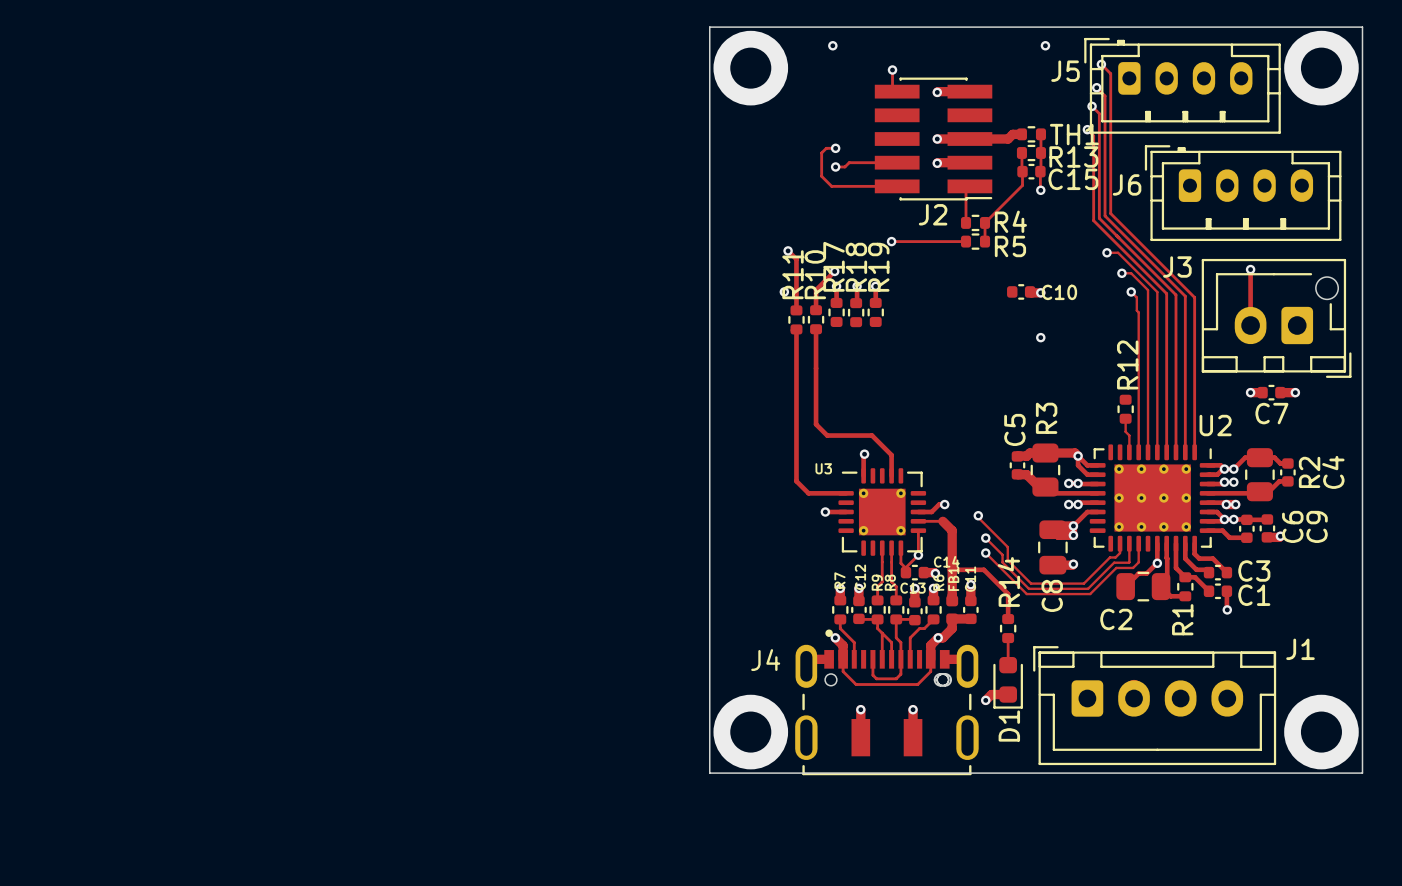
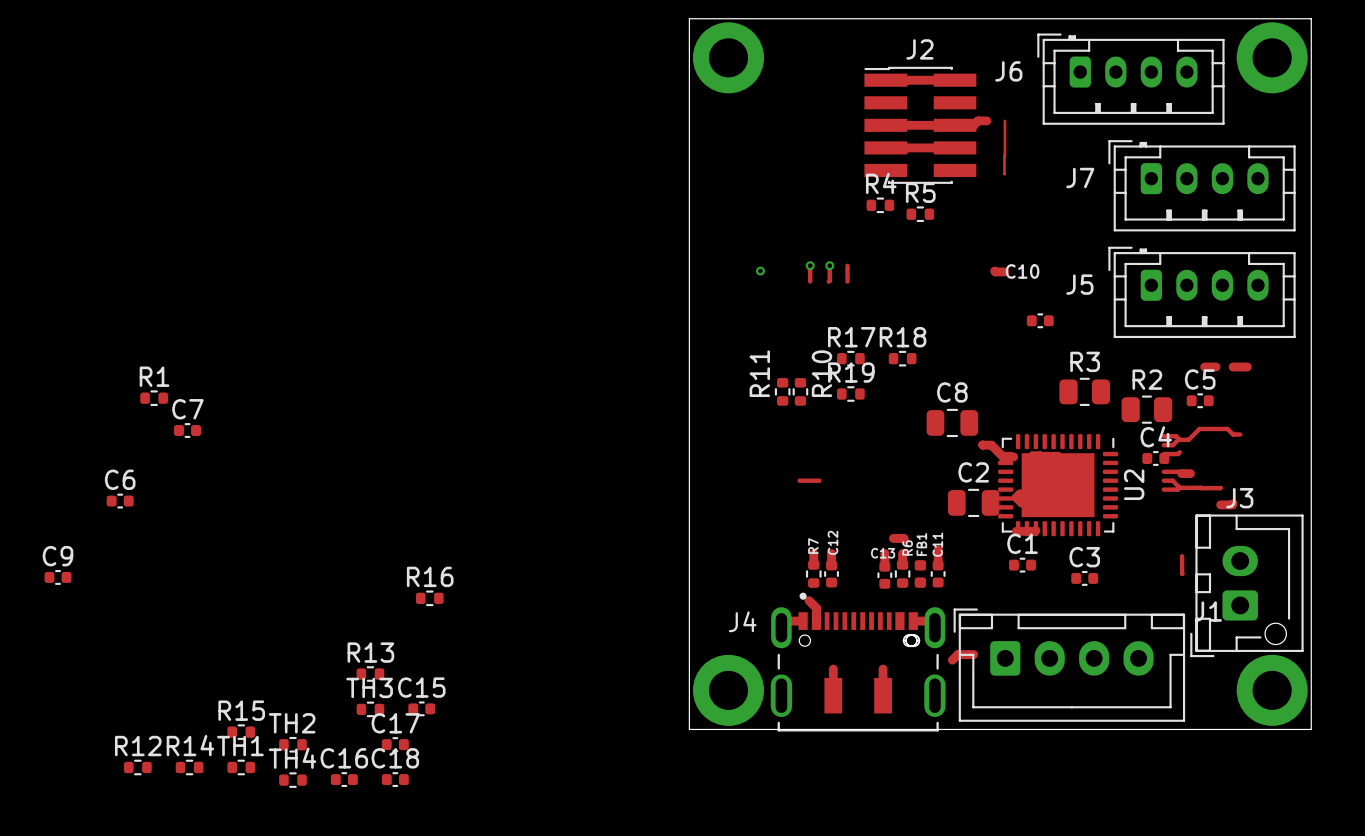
via: (832, 45) -> none
via: (1045, 45) -> none
track: (1101, 64) (1110, 73) (1110, 213) (1194, 297) (1194, 452) -> none
via: (1101, 64) -> none
track: (892, 70) (892, 91) -> none
via: (892, 70) -> none
J5 name position: J5 (1065, 71) -> J5 (1079, 284)
J5 position: (1182, 85) -> (1201, 292)
track: (1096, 87) (1105, 96) (1105, 215) (1185, 296) (1185, 452) -> none
via: (1096, 87) -> none
via: (937, 92) -> none
track: (1092, 106) (1099, 113) (1099, 218) (1175, 294) (1175, 452) -> none
via: (1092, 106) -> none
track: (1087, 129) (1093, 135) (1093, 220) (1166, 293) (1166, 452) -> none
via: (1087, 129) -> none
TH1 position: (1031, 134) -> (241, 767)
TH1 name position: TH1 (1074, 134) -> TH1 (240, 746)
J2 rotation: 0° (933, 139) -> 180° (920, 125)
via: (937, 139) -> none
track: (835, 148) (826, 148) (821, 152) (821, 176) (831, 186) (892, 186) -> none
via: (835, 148) -> none
track: (1021, 152) (1022, 185) (985, 222) (985, 241) -> none
R13 position: (1031, 152) -> (370, 674)
R13 name position: R13 (1073, 156) -> R13 (370, 652)
track: (892, 162) (849, 162) (844, 166) (835, 166) -> none
via: (937, 163) -> none
via: (835, 166) -> none
C15 position: (1031, 171) -> (421, 708)
C15 name position: C15 (1073, 179) -> C15 (421, 687)
J6 name position: J6 (1127, 184) -> J6 (1008, 71)
track: (965, 186) (966, 222) -> none
via: (1040, 190) -> none
J6 position: (1243, 193) -> (1130, 79)
J7: none -> (1201, 185)
R4 name position: R4 (1010, 221) -> R4 (881, 183)
R4 position: (975, 222) -> (880, 205)
track: (891, 241) (966, 241) -> none
via: (891, 241) -> none
R5 position: (975, 241) -> (920, 214)
R5 name position: R5 (1010, 246) -> R5 (920, 192)
track: (788, 250) (796, 259) (796, 310) -> none
via: (788, 250) -> none
track: (1106, 252) (1118, 252) (1157, 292) (1157, 452) -> none
via: (1106, 252) -> none
J3 name position: J3 (1177, 266) -> J3 (1239, 498)
track: (1250, 269) (1250, 325) -> none
via: (1250, 269) -> none
track: (834, 271) (816, 290) (816, 310) -> none
via: (834, 271) -> none
track: (1121, 273) (1131, 273) (1148, 290) (1148, 452) -> none
via: (1121, 273) -> none
R11 name position: R11 (792, 274) -> R11 (759, 373)
R10 name position: R10 (815, 274) -> R10 (821, 373)
via: (875, 286) -> none
C10 position: (1021, 291) -> (1040, 320)
track: (1131, 291) (1136, 297) (1136, 310) (1138, 312) (1138, 452) -> none
via: (1131, 291) -> none
via: (1040, 292) -> none
R17 rotation: 0° (836, 312) -> 90° clockwise (850, 358)
R17 position: (836, 312) -> (850, 358)
R18 rotation: 0° (856, 312) -> 90° clockwise (902, 358)
R18 position: (856, 312) -> (902, 358)
R19 rotation: 0° (875, 312) -> 90° clockwise (850, 394)
R19 position: (875, 312) -> (850, 394)
J3 rotation: 0° (1276, 318) -> 90° clockwise (1246, 585)
J3 position: (1276, 318) -> (1246, 585)
R11 position: (796, 319) -> (782, 391)
R10 position: (816, 319) -> (800, 391)
track: (796, 329) (796, 481) (808, 493) (846, 493) -> none
track: (816, 329) (816, 424) (827, 435) (872, 435) (891, 455) (891, 475) -> none
via: (1040, 337) -> none
via: (1250, 392) -> none
C7 position: (1271, 392) -> (187, 430)
via: (1295, 392) -> none
R12 rotation: 0° (1125, 409) -> 90° clockwise (137, 767)
R12 position: (1125, 409) -> (137, 767)
C7 name position: C7 (1271, 413) -> C7 (187, 409)
track: (1125, 418) (1125, 431) (1129, 435) (1129, 452) -> none
U2 name position: U2 (1215, 425) -> U2 (1134, 484)
U2 footprint: [1089, 444, 1216, 552] -> [998, 434, 1119, 537]
track: (864, 454) (863, 475) -> none
via: (864, 454) -> none
track: (1078, 456) (1087, 465) (1097, 465) -> none
track: (1078, 456) (1078, 465) (1087, 474) (1097, 474) -> none
track: (1078, 456) (1075, 453) (1029, 453) (1026, 456) (1017, 456) -> none
via: (1078, 456) -> none
C5 rotation: 0° (1017, 465) -> 90° clockwise (1200, 400)
C5 position: (1017, 465) -> (1200, 400)
via: (1224, 469) -> none
via: (1233, 469) -> none
R3 rotation: 0° (1045, 470) -> 90° clockwise (1084, 391)
R3 position: (1045, 470) -> (1084, 391)
C4 rotation: 0° (1287, 472) -> 90° clockwise (1155, 458)
C4 position: (1287, 472) -> (1155, 458)
R2 name position: R2 (1309, 472) -> R2 (1147, 379)
C4 name position: C4 (1333, 472) -> C4 (1156, 436)
R2 rotation: 0° (1259, 474) -> 90° clockwise (1146, 409)
R2 position: (1259, 474) -> (1146, 409)
track: (1287, 481) (1279, 481) (1269, 491) (1258, 493) (1207, 493) -> none
via: (1224, 482) -> none
via: (1233, 482) -> none
via: (1068, 483) -> none
via: (1078, 483) -> none
track: (1053, 493) (1097, 493) -> none
track: (1097, 502) (1079, 502) (1078, 504) -> none
track: (944, 504) (939, 504) (931, 512) (918, 512) -> none
via: (944, 504) -> none
via: (1068, 504) -> none
via: (1078, 504) -> none
via: (1226, 504) -> none
via: (1235, 504) -> none
via: (825, 512) -> none
U3: (882, 512) -> none
track: (1097, 512) (1087, 512) (1073, 525) -> none
track: (978, 515) (1007, 547) (1007, 560) (1031, 583) (1083, 583) (1109, 557) (1115, 557) (1120, 553) (1120, 543) -> none
via: (978, 515) -> none
via: (1224, 519) -> none
via: (1233, 519) -> none
track: (918, 521) (942, 521) (952, 530) (952, 600) -> none
via: (1073, 525) -> none
C6 name position: C6 (1292, 526) -> C6 (120, 479)
C9 name position: C9 (1317, 526) -> C9 (58, 556)
C6 rotation: 0° (1246, 528) -> 90° clockwise (120, 501)
C6 position: (1246, 528) -> (120, 501)
C9 rotation: 0° (1267, 528) -> 90° clockwise (58, 577)
C9 position: (1267, 528) -> (58, 577)
track: (918, 530) (918, 555) (905, 567) (905, 572) -> none
track: (1207, 530) (1222, 530) (1229, 537) (1246, 537) -> none
via: (1073, 535) -> none
via: (1280, 536) -> none
track: (985, 538) (1002, 554) (1002, 562) (1028, 588) (1088, 588) (1114, 562) (1129, 562) (1129, 543) -> none
via: (985, 538) -> none
track: (1138, 543) (1138, 562) (1133, 567) (1116, 567) (1090, 594) (1026, 594) (985, 553) -> none
track: (1157, 543) (1157, 563) (1146, 573) (1138, 573) (1125, 586) -> none
track: (1166, 543) (1167, 580) (1161, 586) (1170, 596) (1185, 596) -> none
track: (1185, 543) (1185, 558) (1196, 569) (1206, 569) (1209, 572) -> none
track: (1194, 543) (1194, 553) (1199, 558) (1212, 558) (1226, 572) -> none
track: (1175, 544) (1175, 567) (1185, 577) (1195, 577) (1209, 591) -> none
C8 rotation: 0° (1052, 547) -> 90° clockwise (952, 422)
C8 position: (1052, 547) -> (952, 422)
track: (882, 548) (882, 581) (877, 586) (877, 600) -> none
track: (891, 548) (891, 581) (896, 586) (896, 600) -> none
track: (900, 548) (900, 563) (905, 568) -> none
via: (985, 553) -> none
via: (918, 555) -> none
via: (1157, 563) -> none
via: (1073, 564) -> none
track: (952, 569) (983, 569) (1008, 594) (1008, 619) -> none
C3 name position: C3 (1254, 570) -> C3 (1084, 557)
C14: (914, 572) -> none
C3 position: (1217, 572) -> (1084, 578)
via: (935, 573) -> none
via: (970, 584) -> none
C2 position: (1143, 586) -> (973, 502)
R1 rotation: 0° (1185, 586) -> 90° clockwise (154, 398)
R1 position: (1185, 586) -> (154, 398)
via: (840, 588) -> none
via: (858, 588) -> none
via: (914, 588) -> none
via: (933, 588) -> none
C1 position: (1217, 591) -> (1022, 565)
C8 name position: C8 (1052, 595) -> C8 (952, 392)
C1 name position: C1 (1254, 595) -> C1 (1022, 543)
R9: (877, 609) -> none
R8: (896, 609) -> none
via: (1227, 609) -> none
track: (858, 618) (877, 619) (877, 628) (891, 642) (891, 659) -> none
track: (914, 618) (896, 619) (896, 637) (900, 642) (900, 674) (896, 678) (876, 678) (872, 675) (872, 659) -> none
track: (970, 618) (952, 618) (952, 628) (942, 637) (938, 637) (930, 645) (930, 671) (917, 684) (856, 684) (843, 671) (843, 659) (840, 656) -> none
track: (840, 619) (840, 628) (854, 642) (854, 659) -> none
track: (933, 619) (924, 628) (919, 628) (910, 637) (910, 659) -> none
C2 name position: C2 (1116, 619) -> C2 (973, 472)
R1 name position: R1 (1182, 619) -> R1 (154, 376)
R14 rotation: 0° (1008, 628) -> 90° clockwise (189, 767)
R14 position: (1008, 628) -> (189, 767)
track: (882, 633) (882, 659) -> none
R16: none -> (429, 598)
via: (835, 637) -> none
via: (938, 637) -> none
track: (1008, 638) (1008, 665) -> none
D1: (1008, 682) -> none
via: (985, 700) -> none
J1 position: (1154, 705) -> (1069, 665)
via: (860, 709) -> none
via: (913, 709) -> none
TH3: none -> (370, 709)
R15: none -> (241, 732)
C17: none -> (395, 744)
TH2: none -> (292, 744)
C16: none -> (344, 779)
C18: none -> (395, 779)
TH4: none -> (292, 780)

